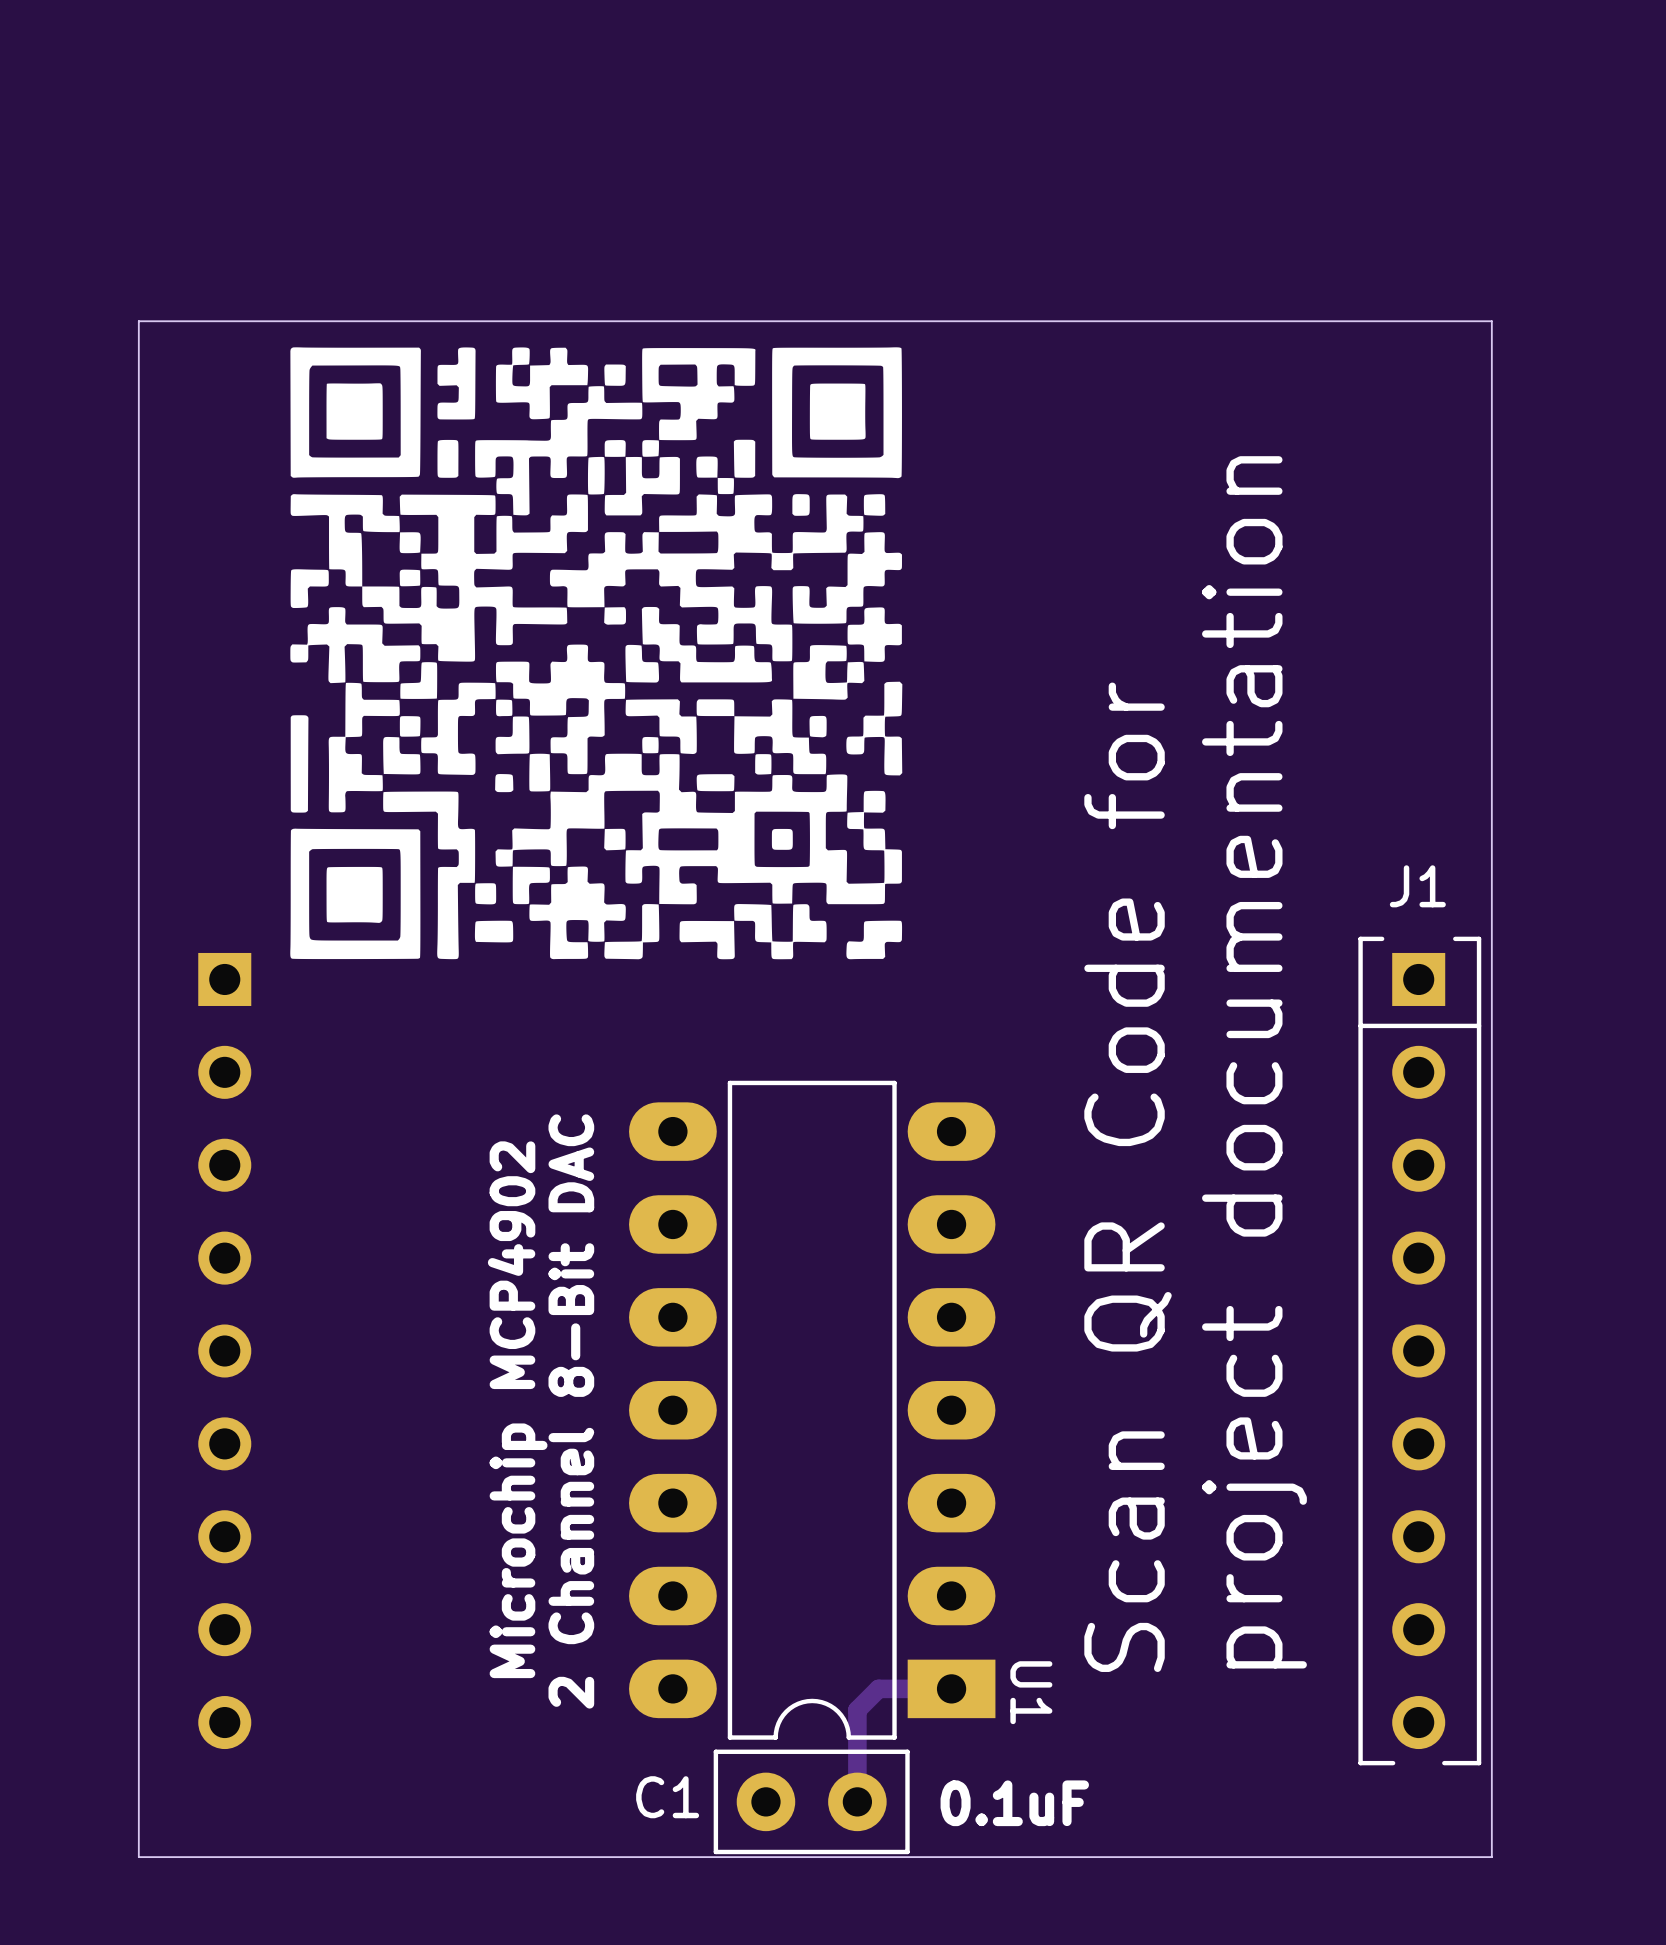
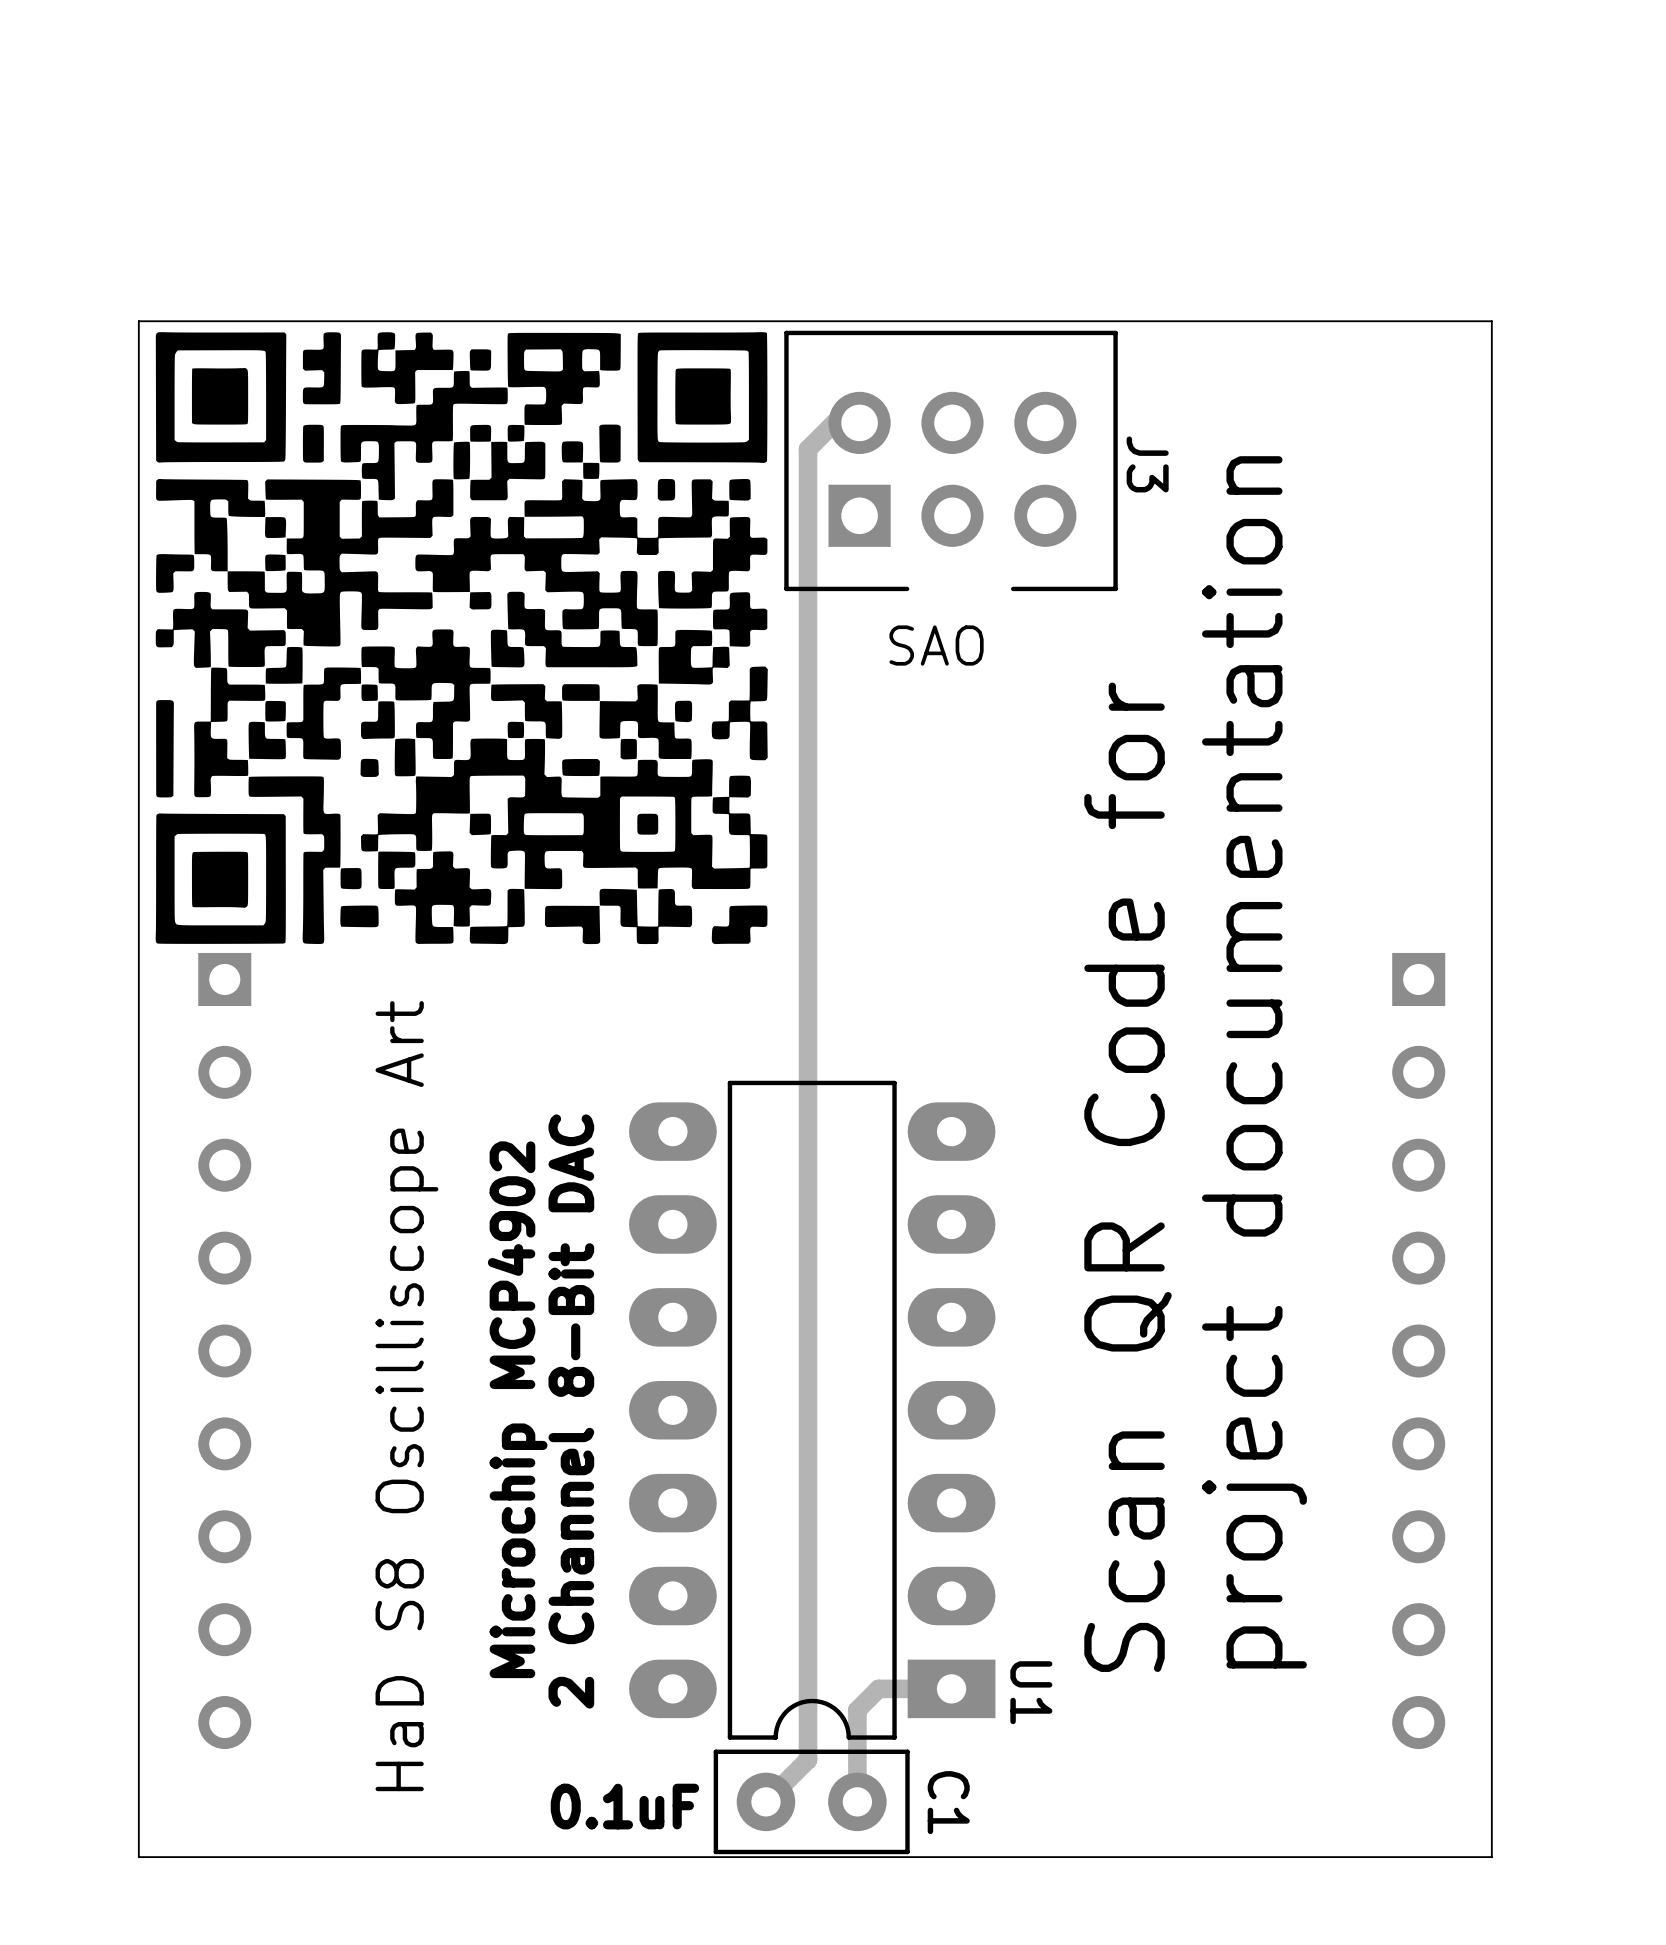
track: none -> (859, 422) (834, 422) (808, 449) (808, 1759) (765, 1801)
J3: none -> (951, 460)
text: none -> SAO (936, 645)
drawing position: (596, 653) -> (461, 638)
J1 side: bottom (1419, 1351) -> top (1418, 1351)
text: none -> HaD S8 Oscilliscope Art (406, 1396)
C1 name rotation: 0° (667, 1797) -> 90° clockwise (948, 1802)
C1 name position: C1 (667, 1797) -> C1 (948, 1802)
text position: 0.1uF (1014, 1803) -> 0.1uF (624, 1806)

